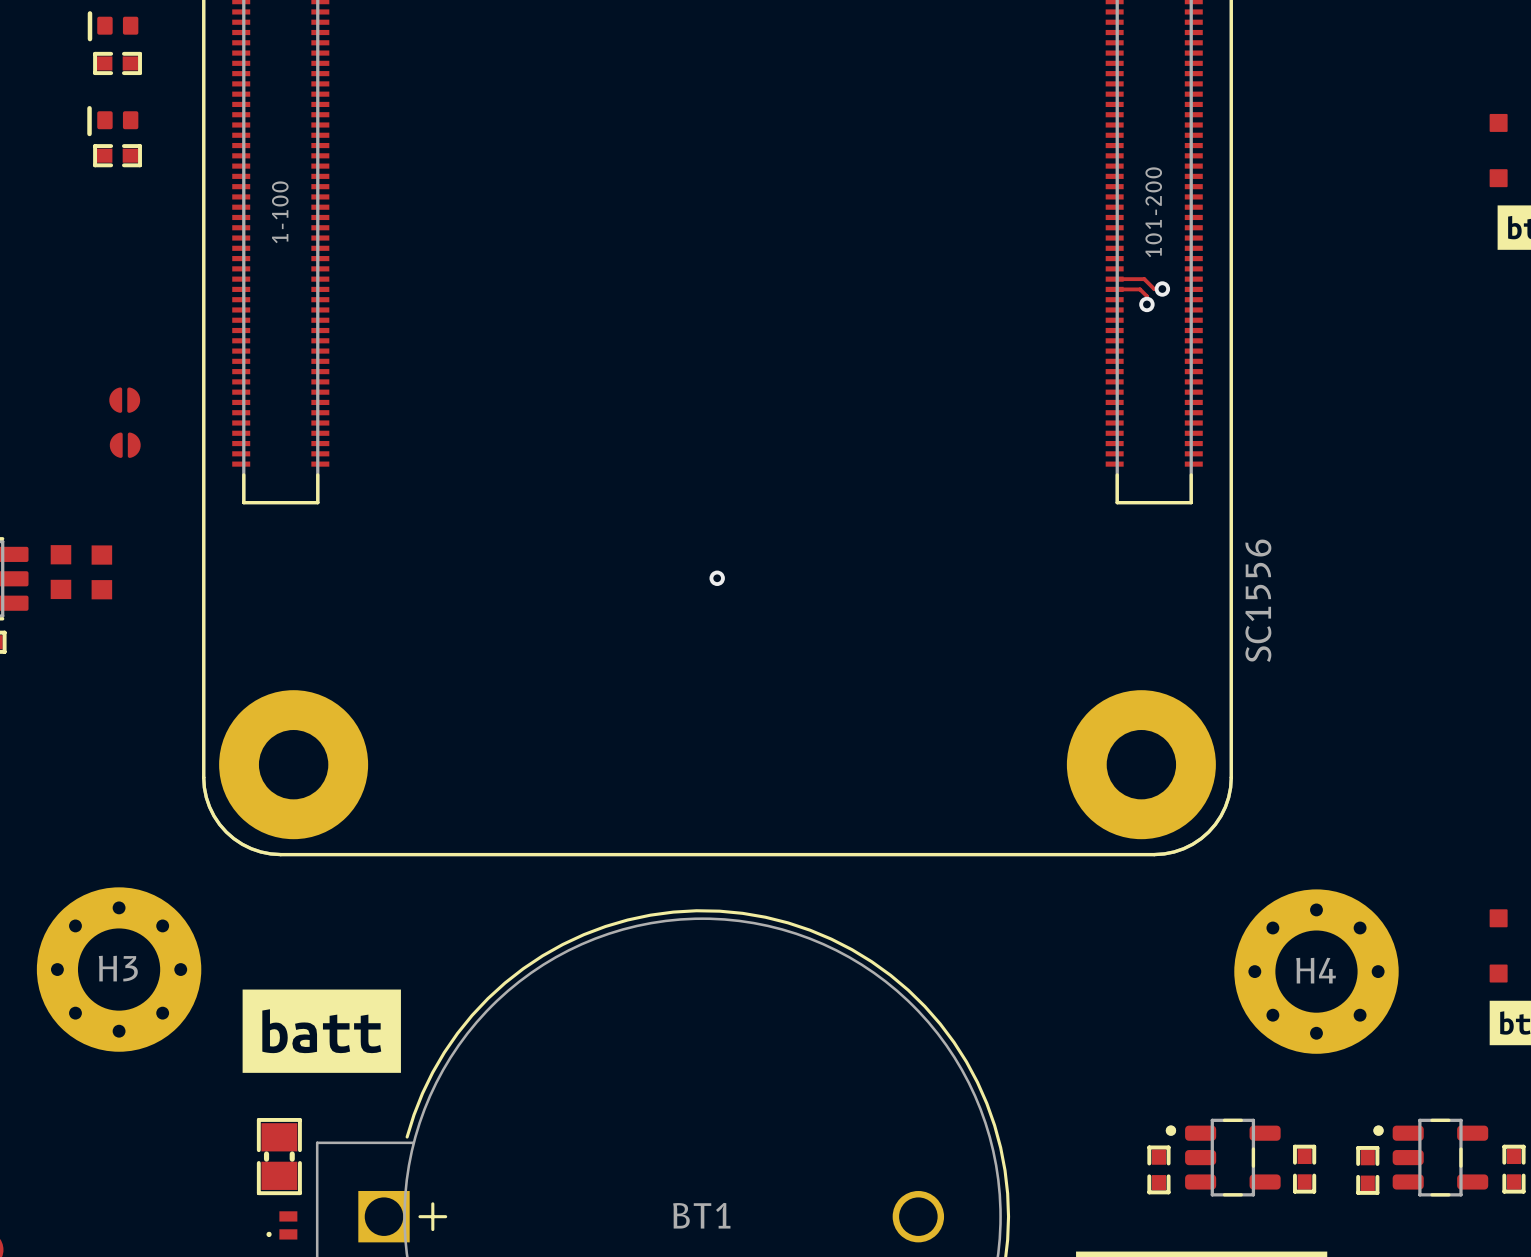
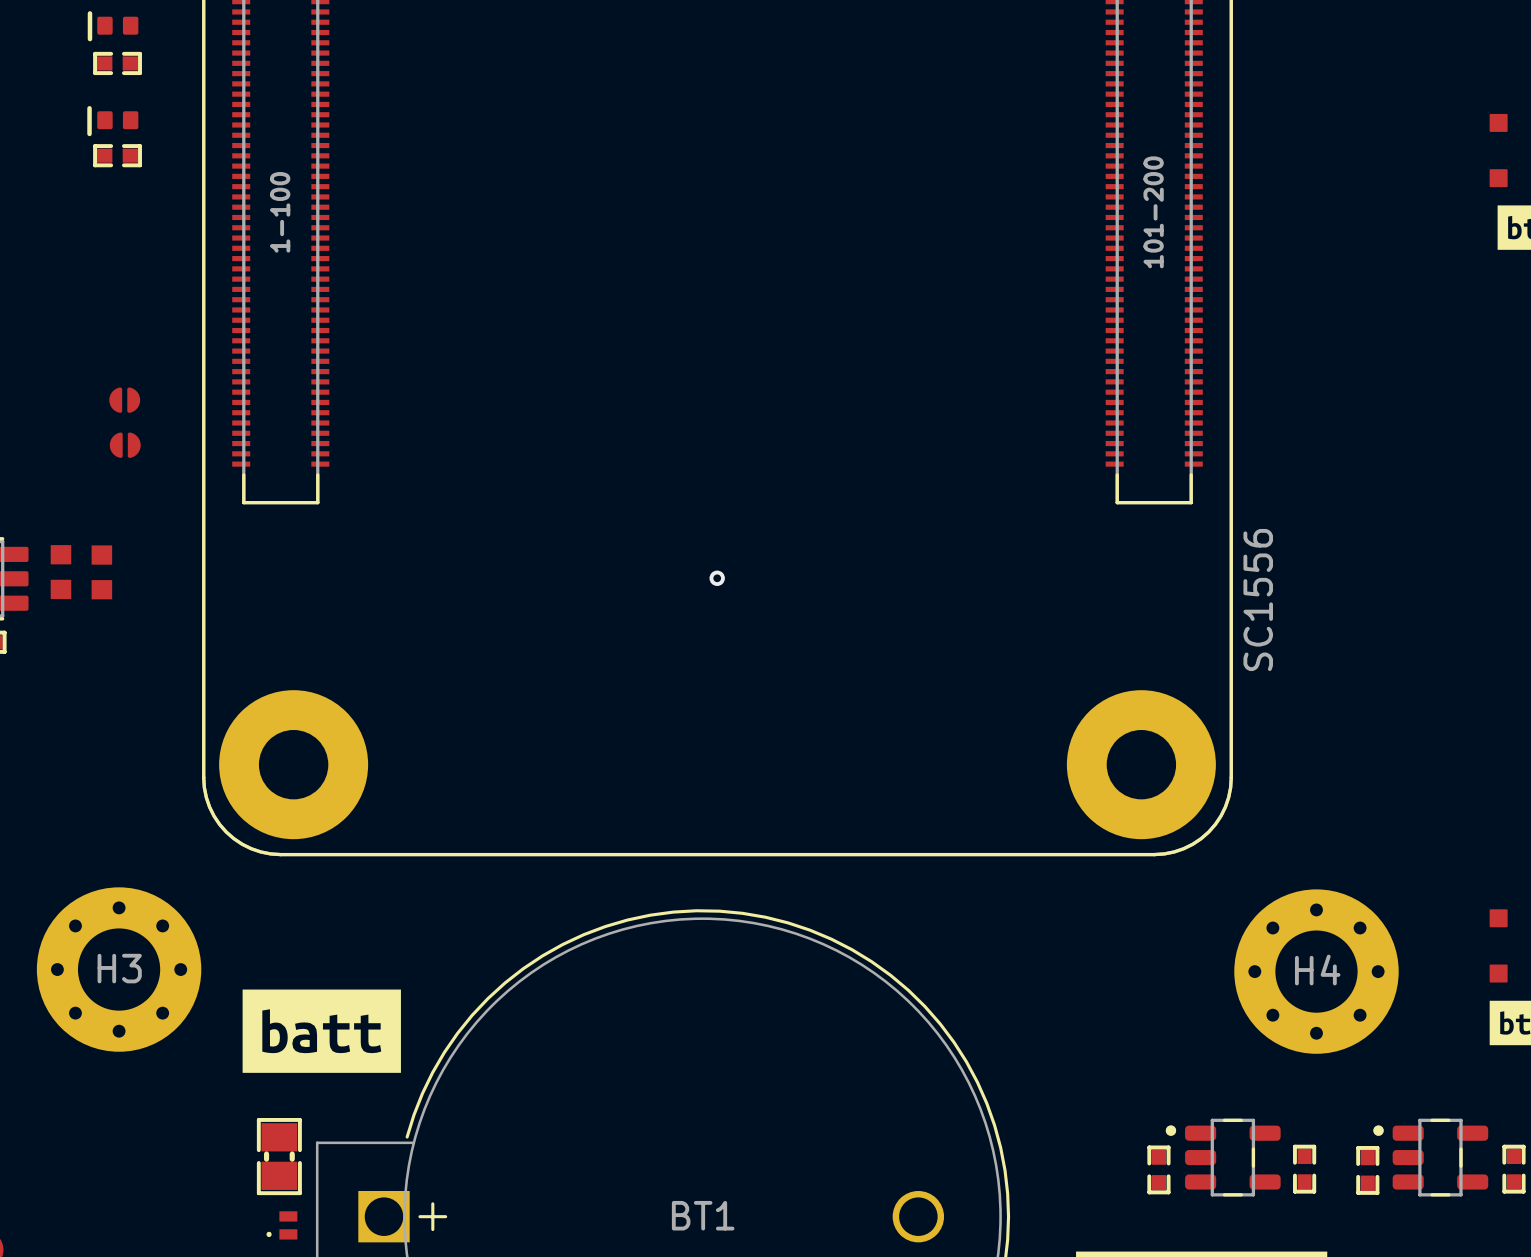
track: (1114, 279) (1144, 279) (1154, 289) (1162, 289) -> none
track: (1114, 289) (1140, 289) (1146, 296) (1146, 304) -> none
via: (1162, 289) -> none
via: (1146, 304) -> none

